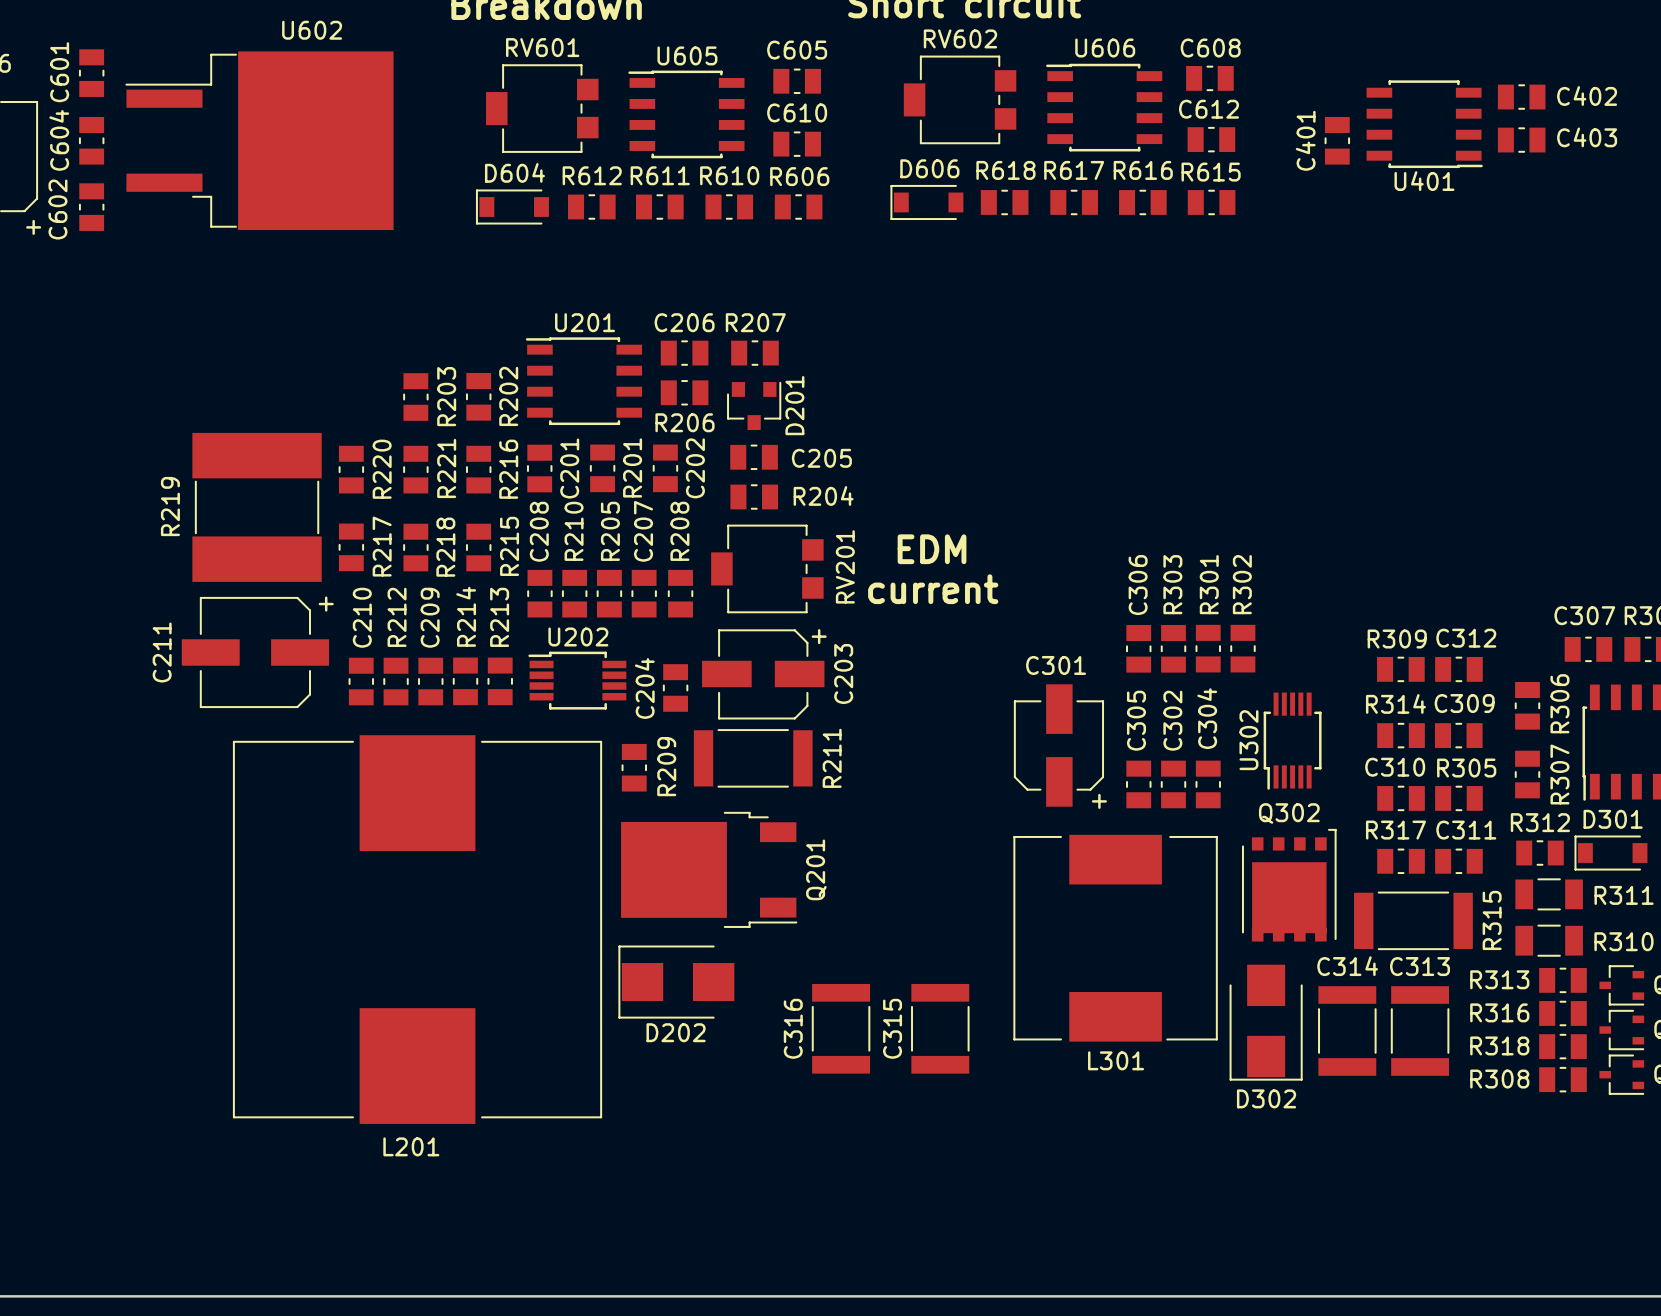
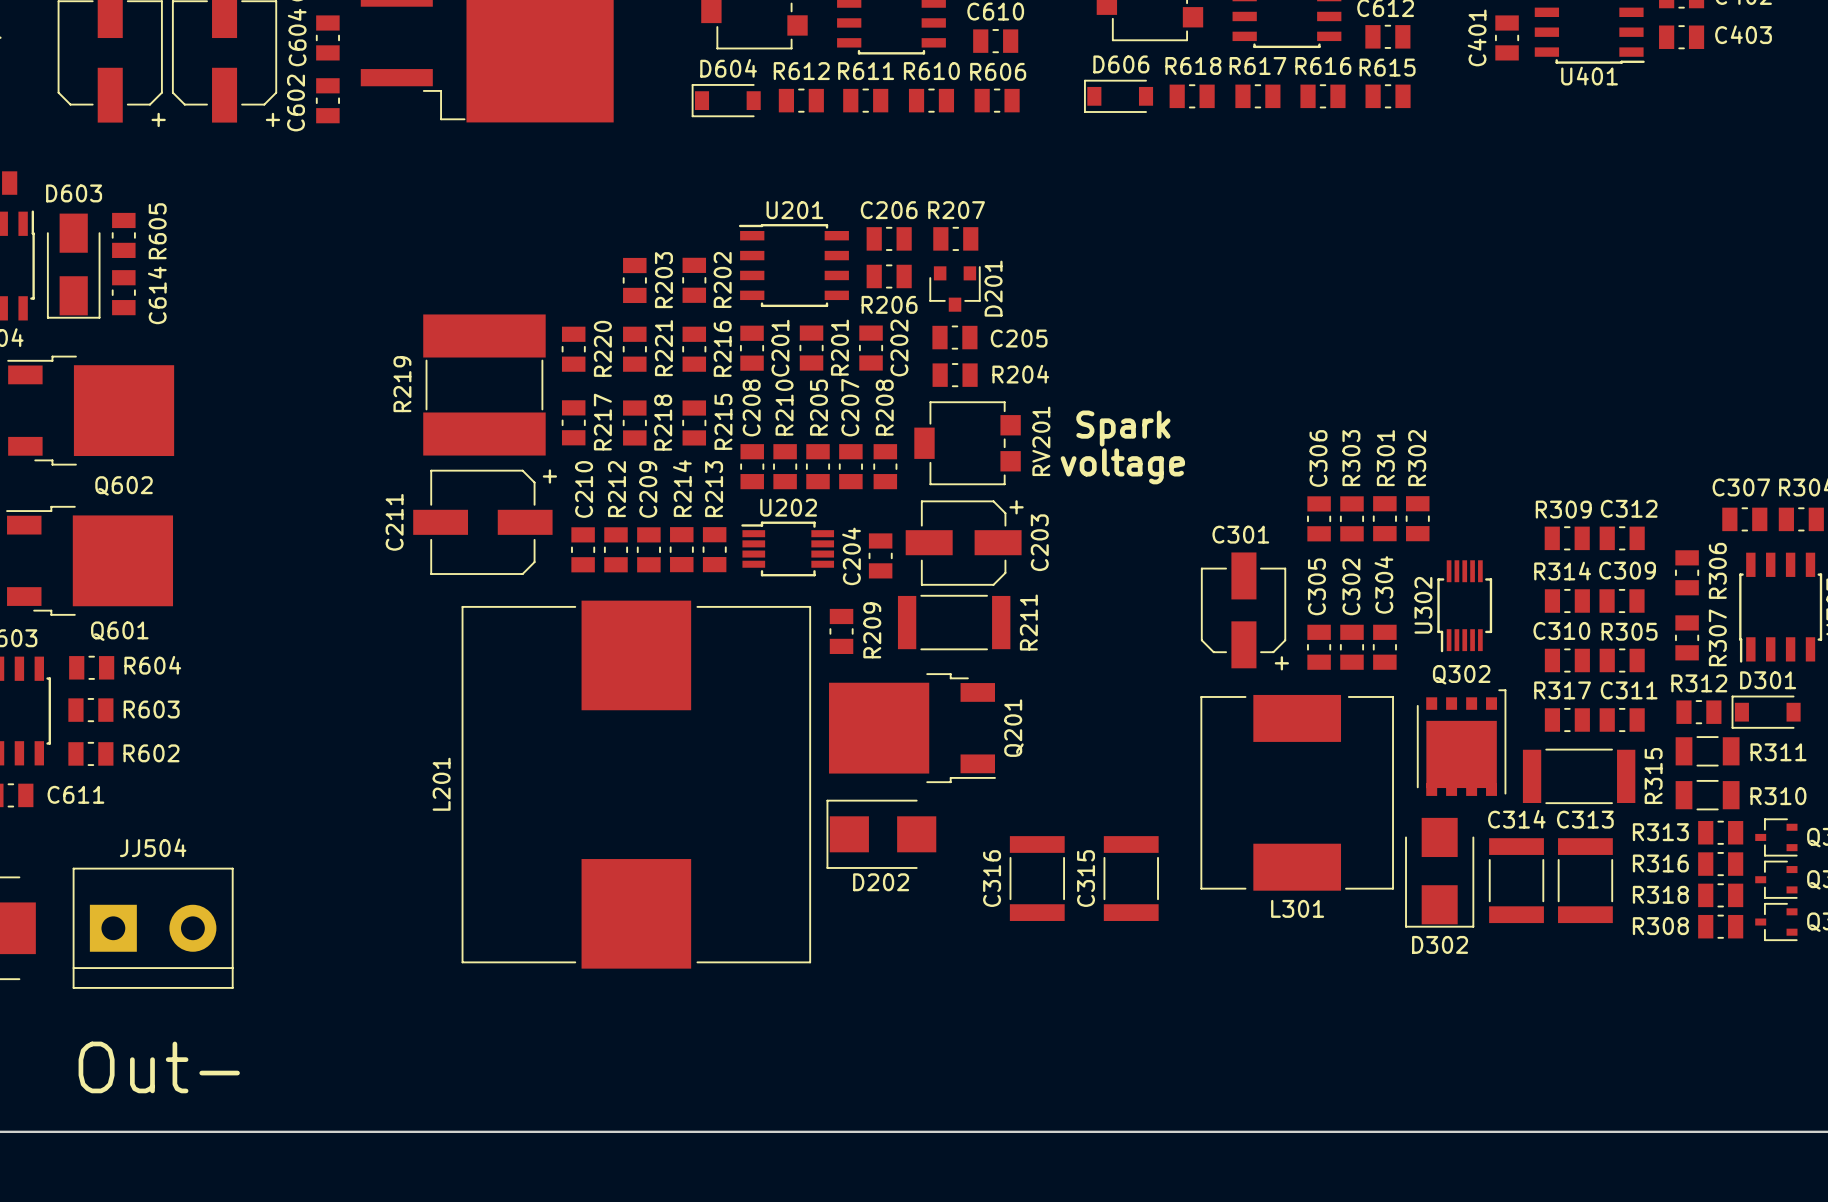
text: EDM (932, 549) -> Spark (1123, 428)
text: current (933, 589) -> voltage (1122, 466)
L201 name rotation: 0° (411, 1146) -> 90° counterclockwise (441, 784)
L201 name position: L201 (411, 1146) -> L201 (441, 784)

